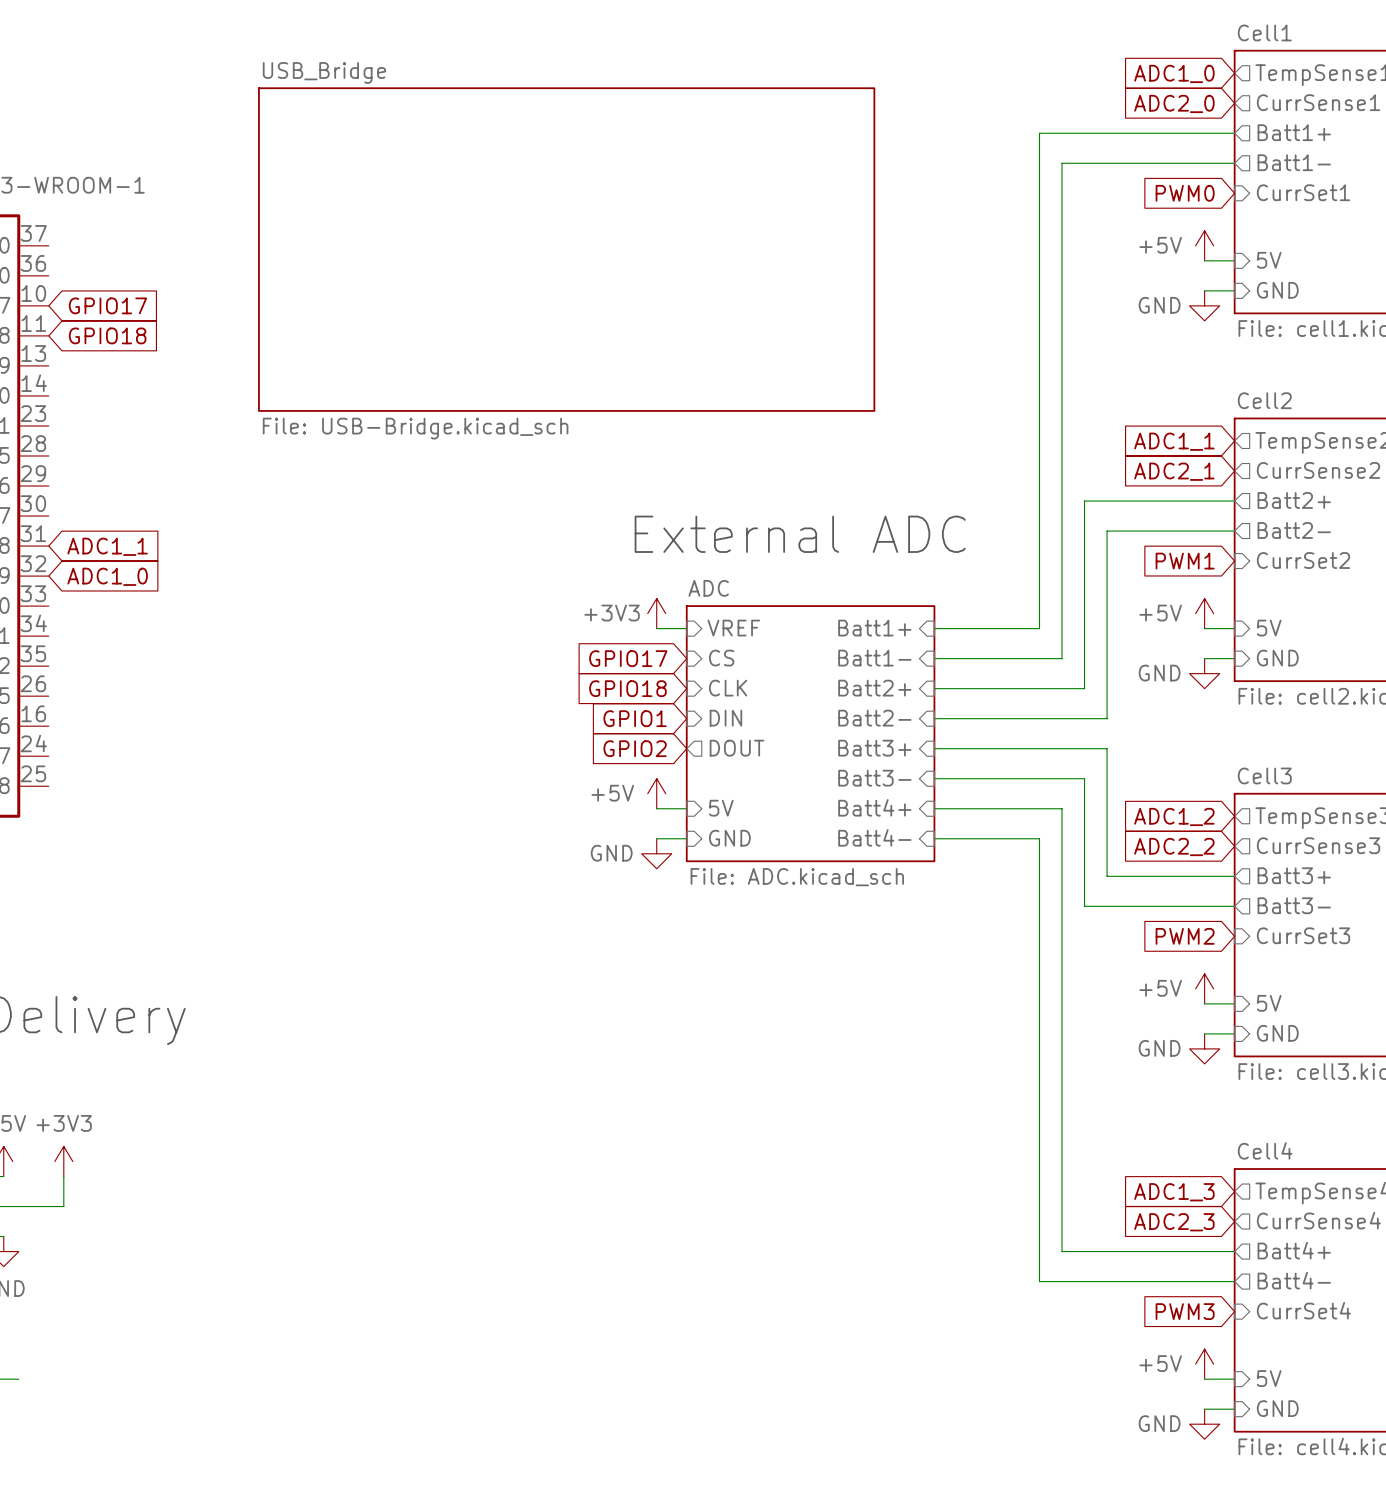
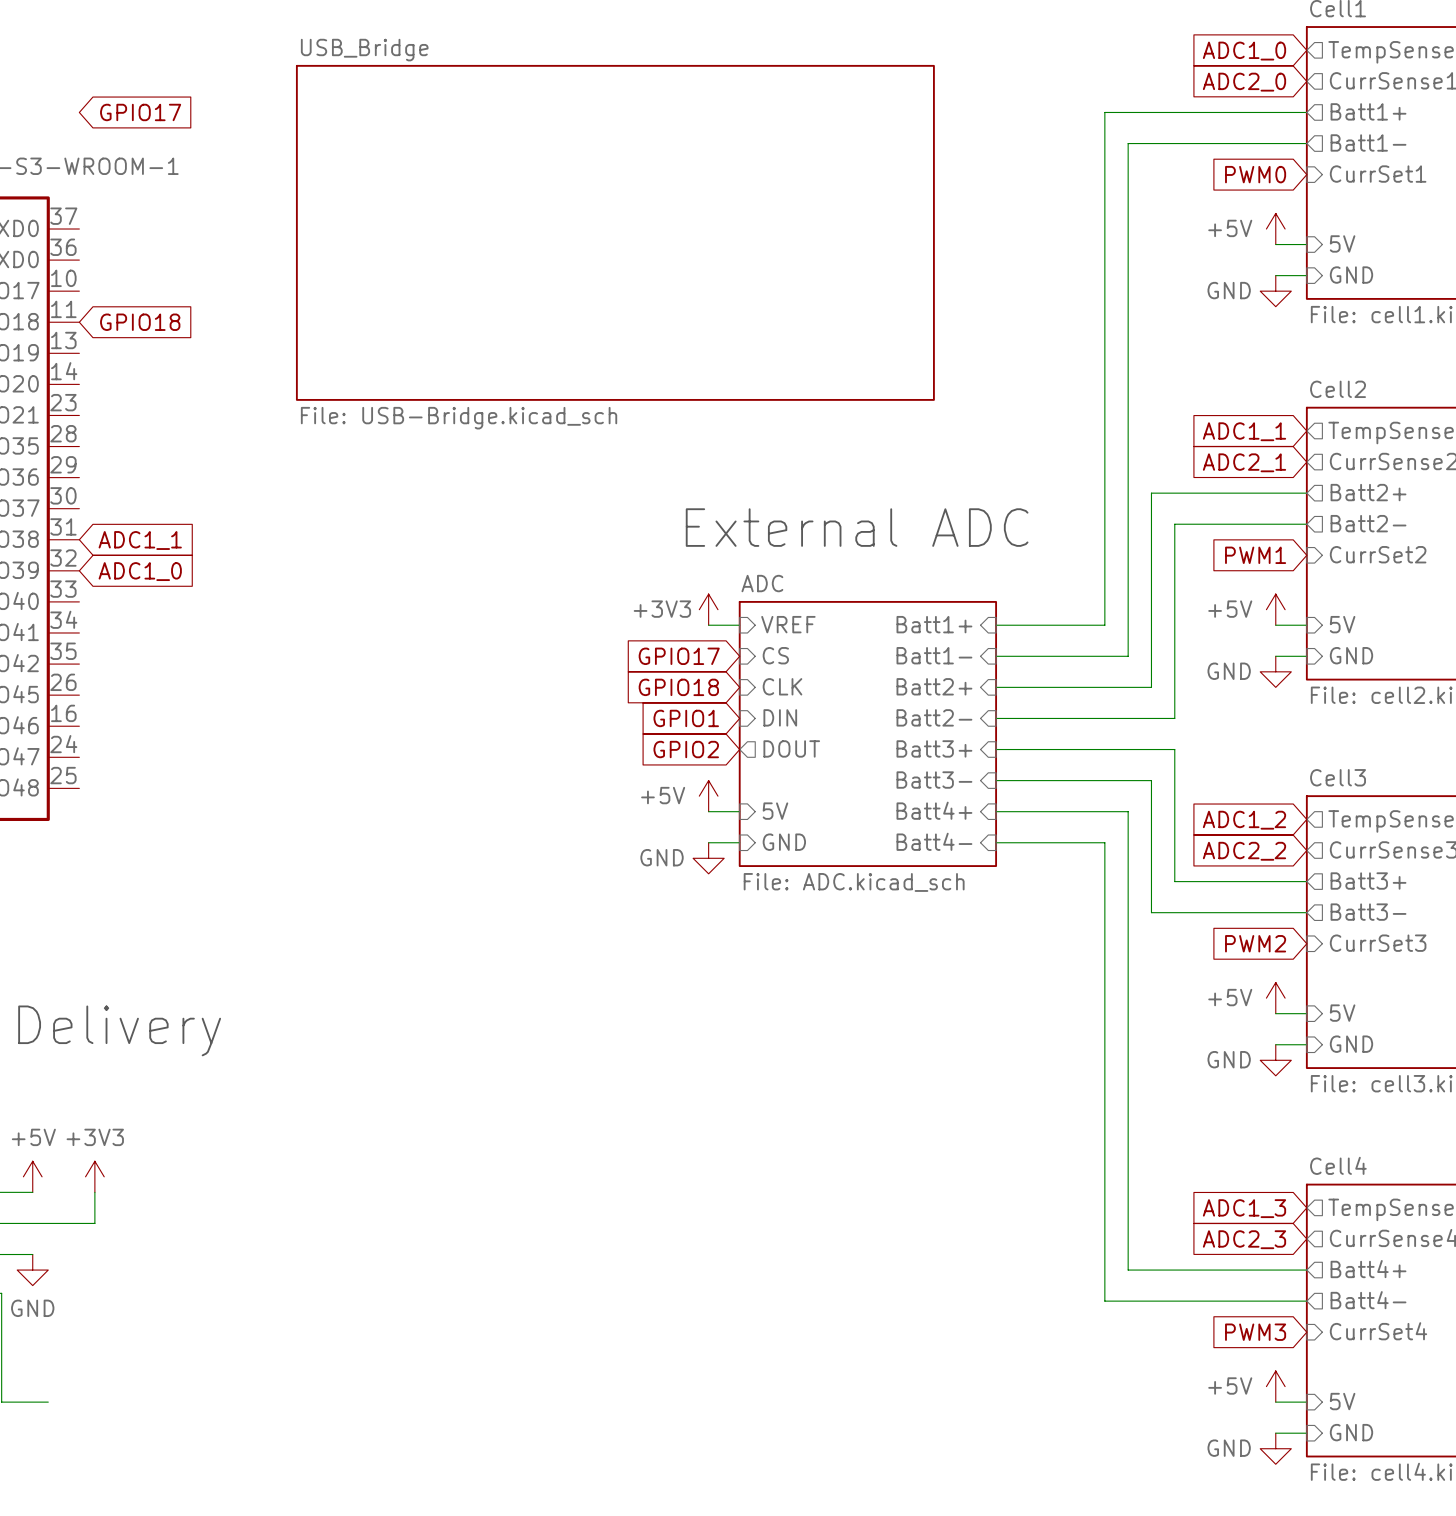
global label position: GPIO17 (107, 305) -> GPIO17 (140, 112)

